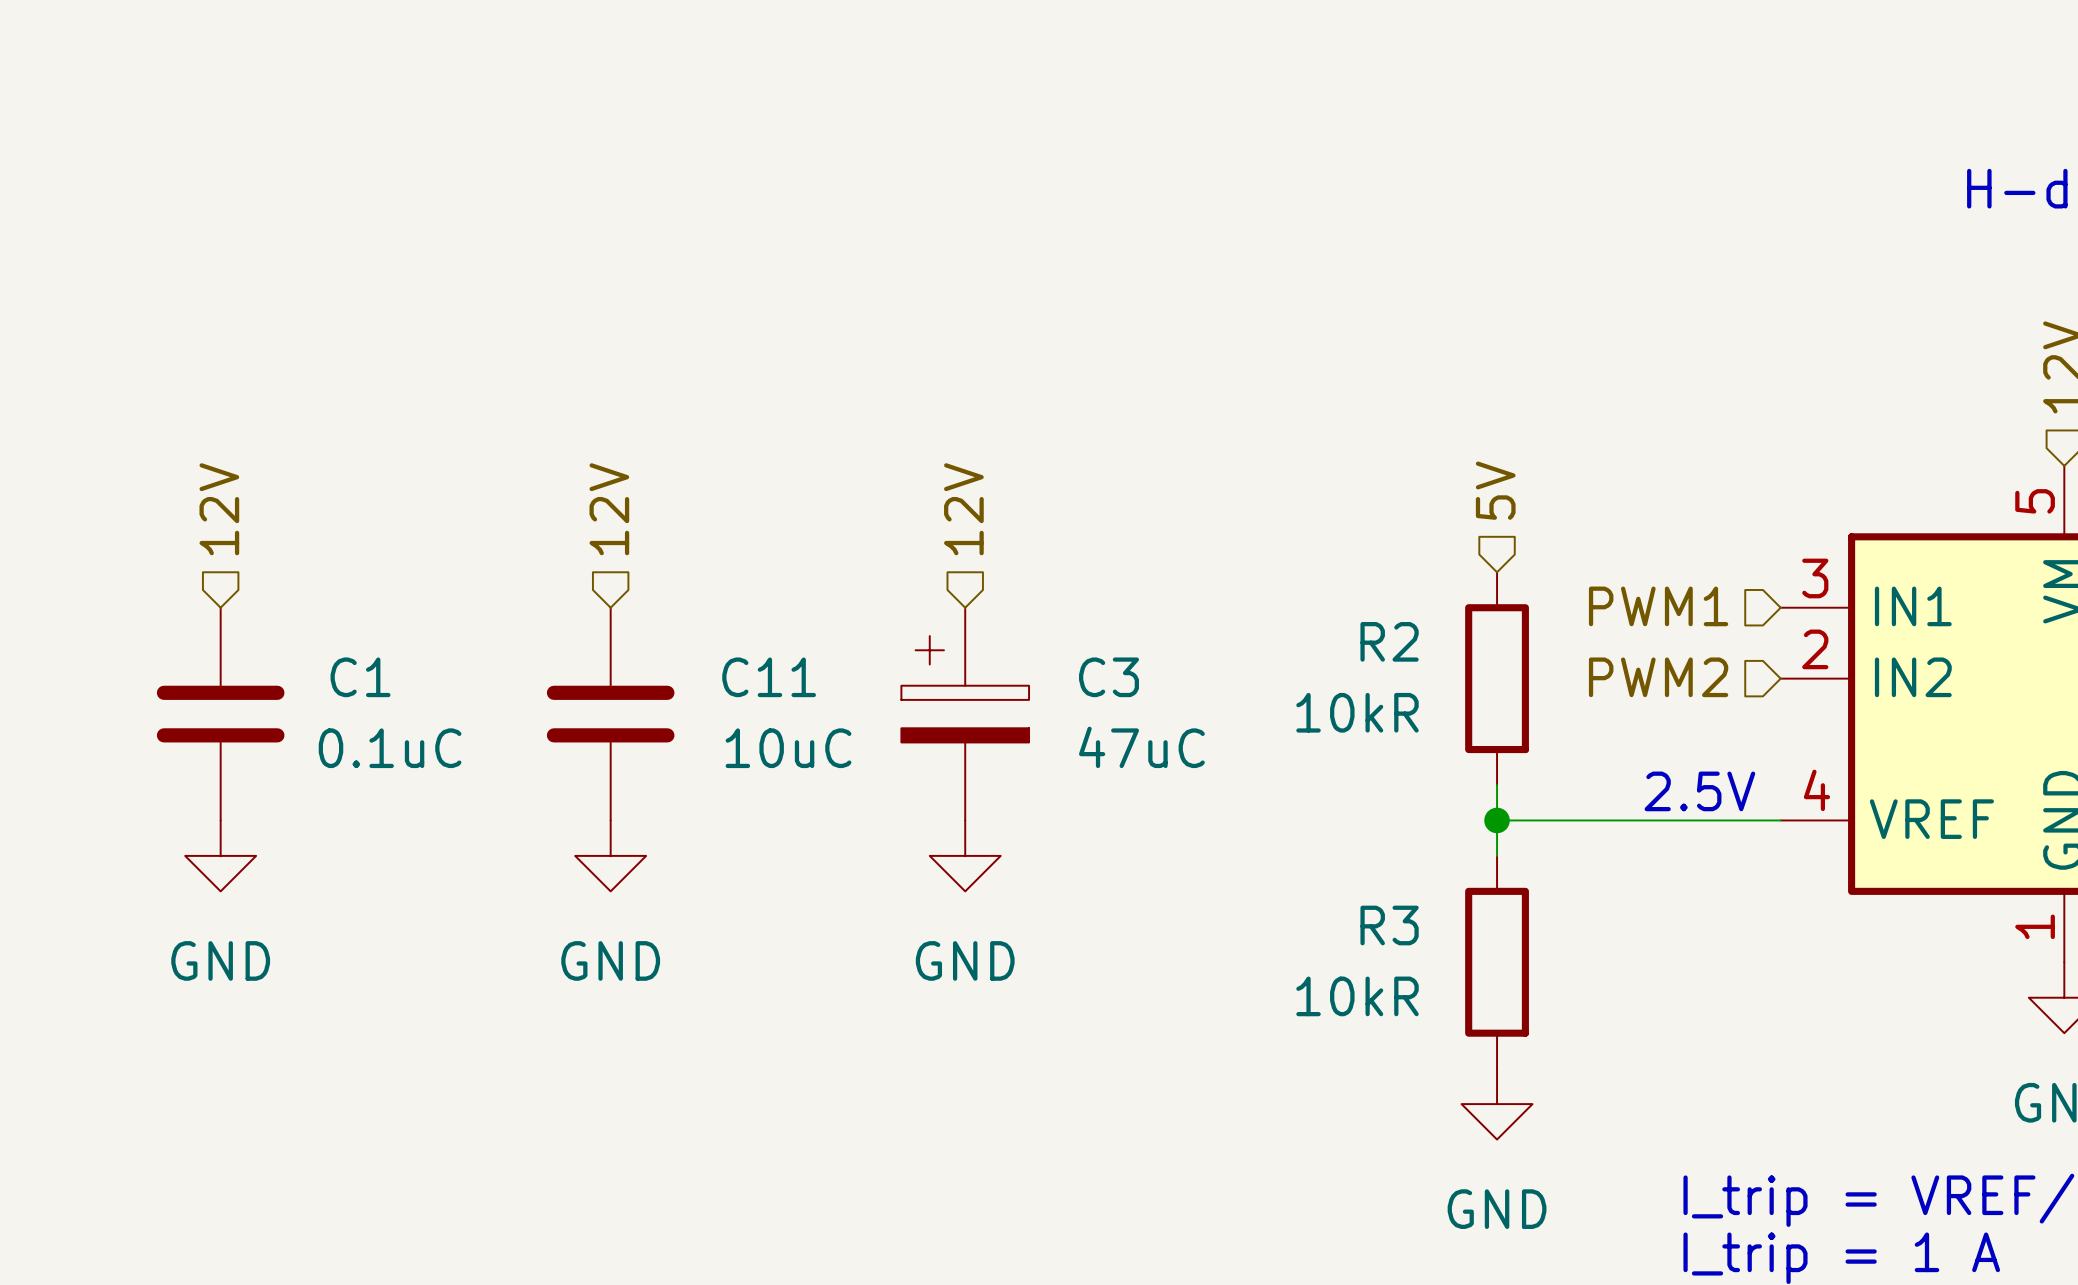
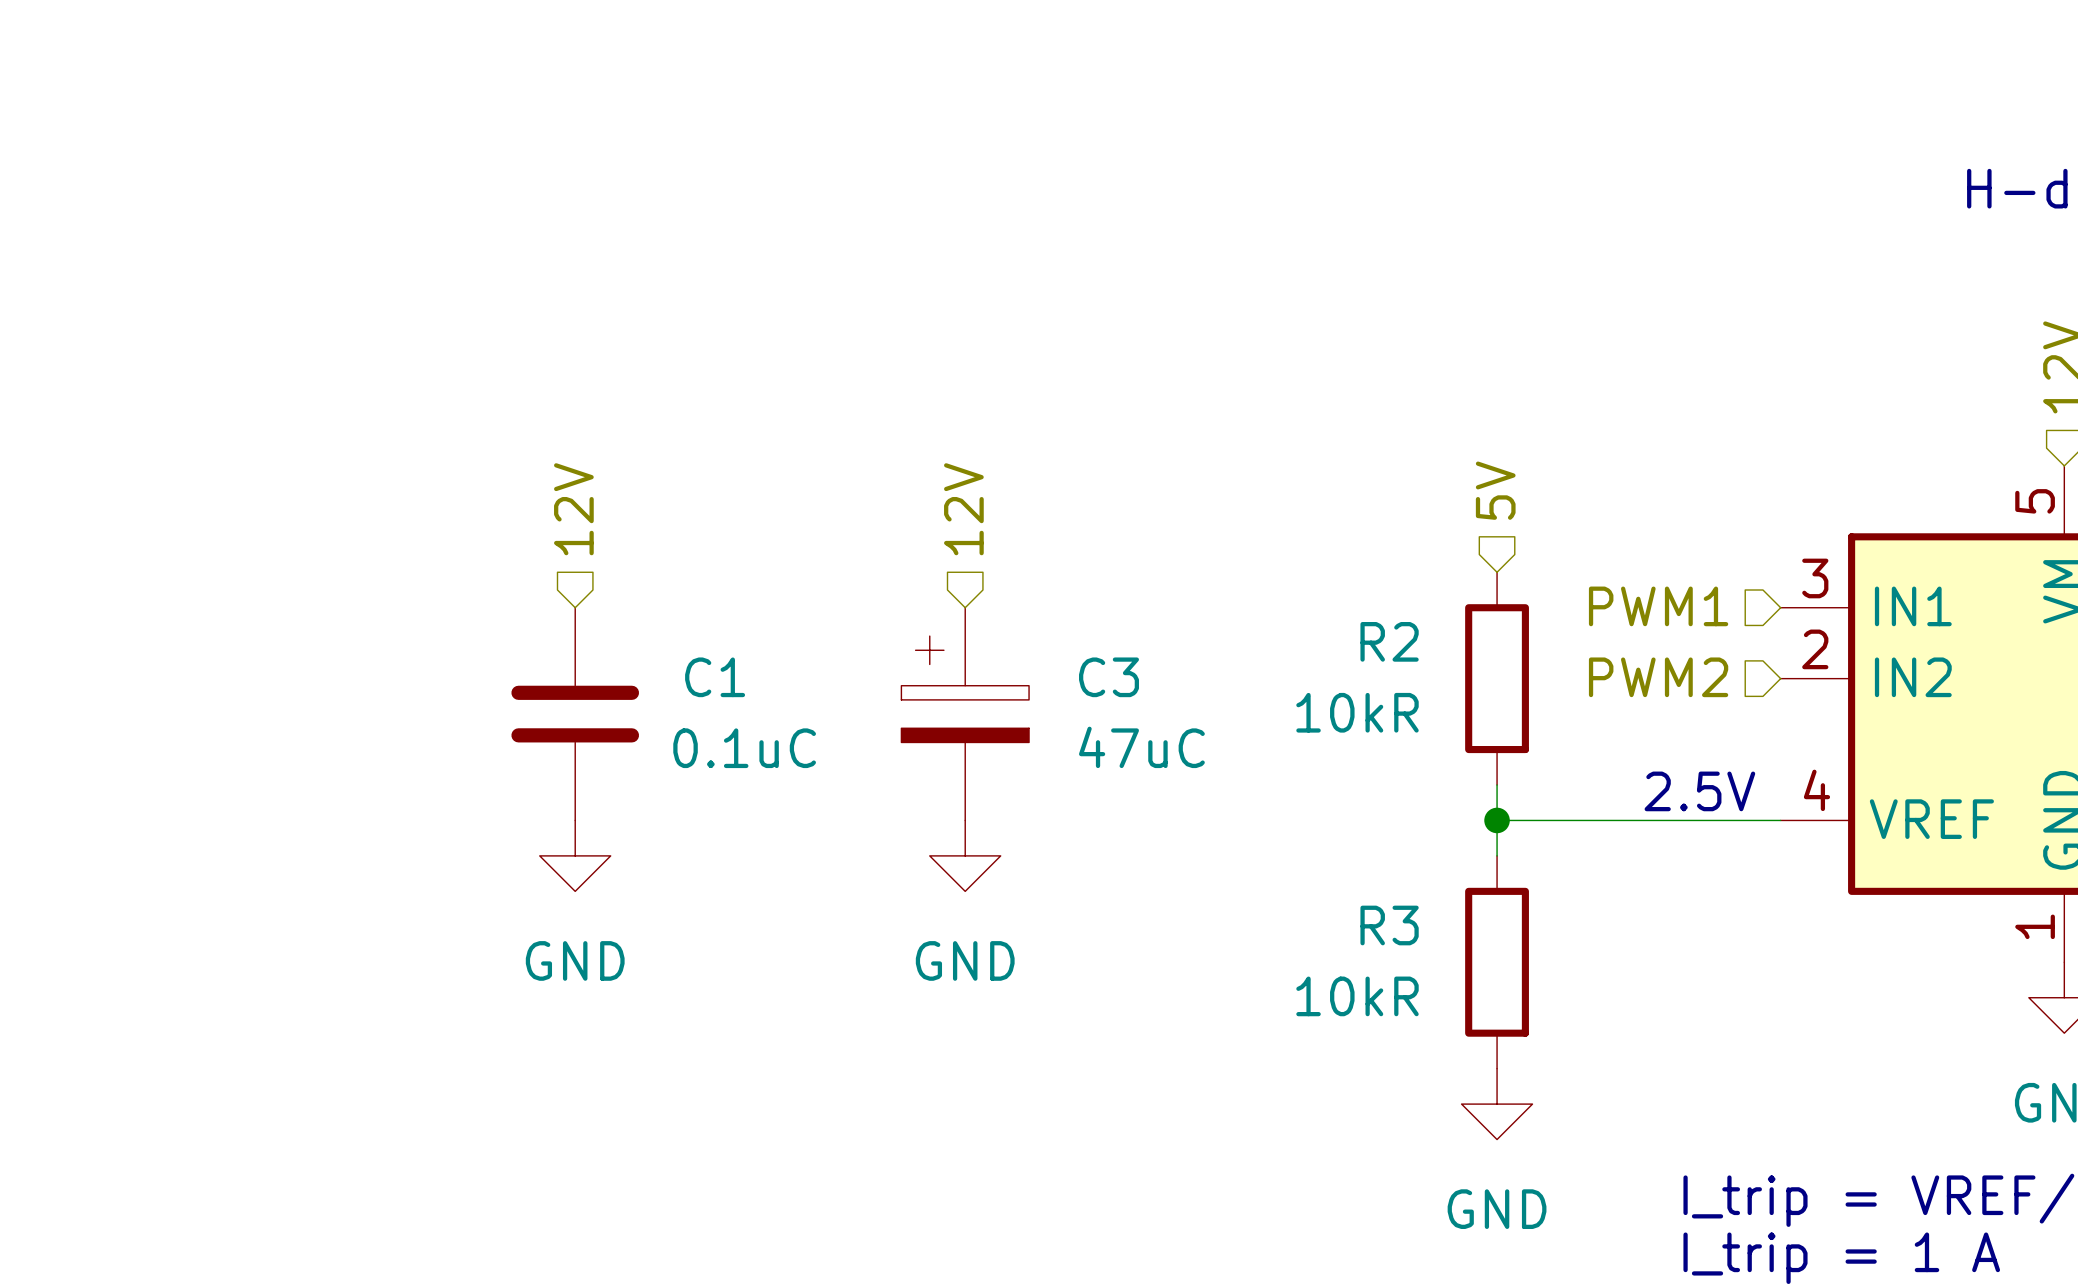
hierarchical label: 12V (219, 509) -> none
hierarchical label position: 12V (609, 509) -> 12V (573, 509)
C1 position: (220, 714) -> (575, 714)
C11: 10uC (610, 714) -> none
power symbol: GND (220, 855) -> none
power symbol position: GND (610, 855) -> GND (575, 855)

